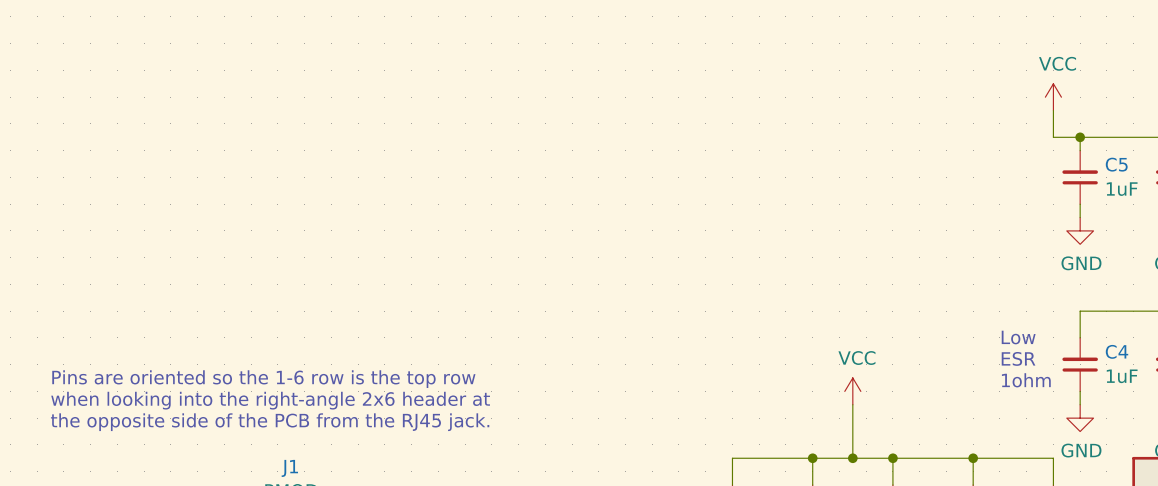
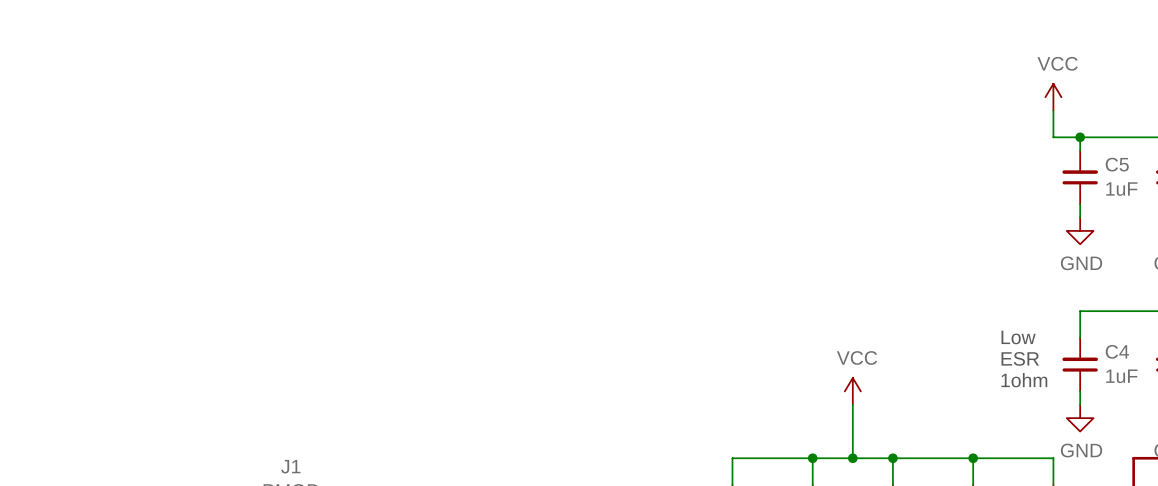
text: Pins are oriented so the 1-6 row is the top row (263, 379) -> none
text: when looking into the right-angle 2x6 header at (270, 400) -> none
text: the opposite side of the PCB from the RJ45 jack. (270, 422) -> none

